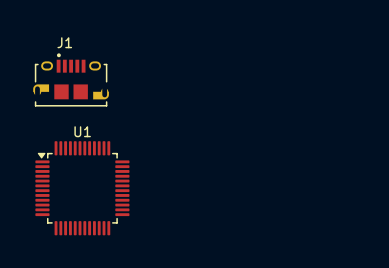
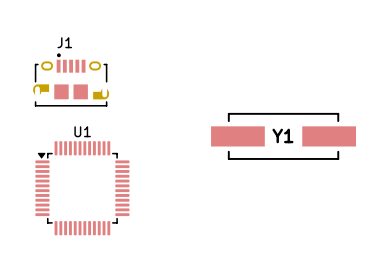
Y1: none -> (283, 136)

